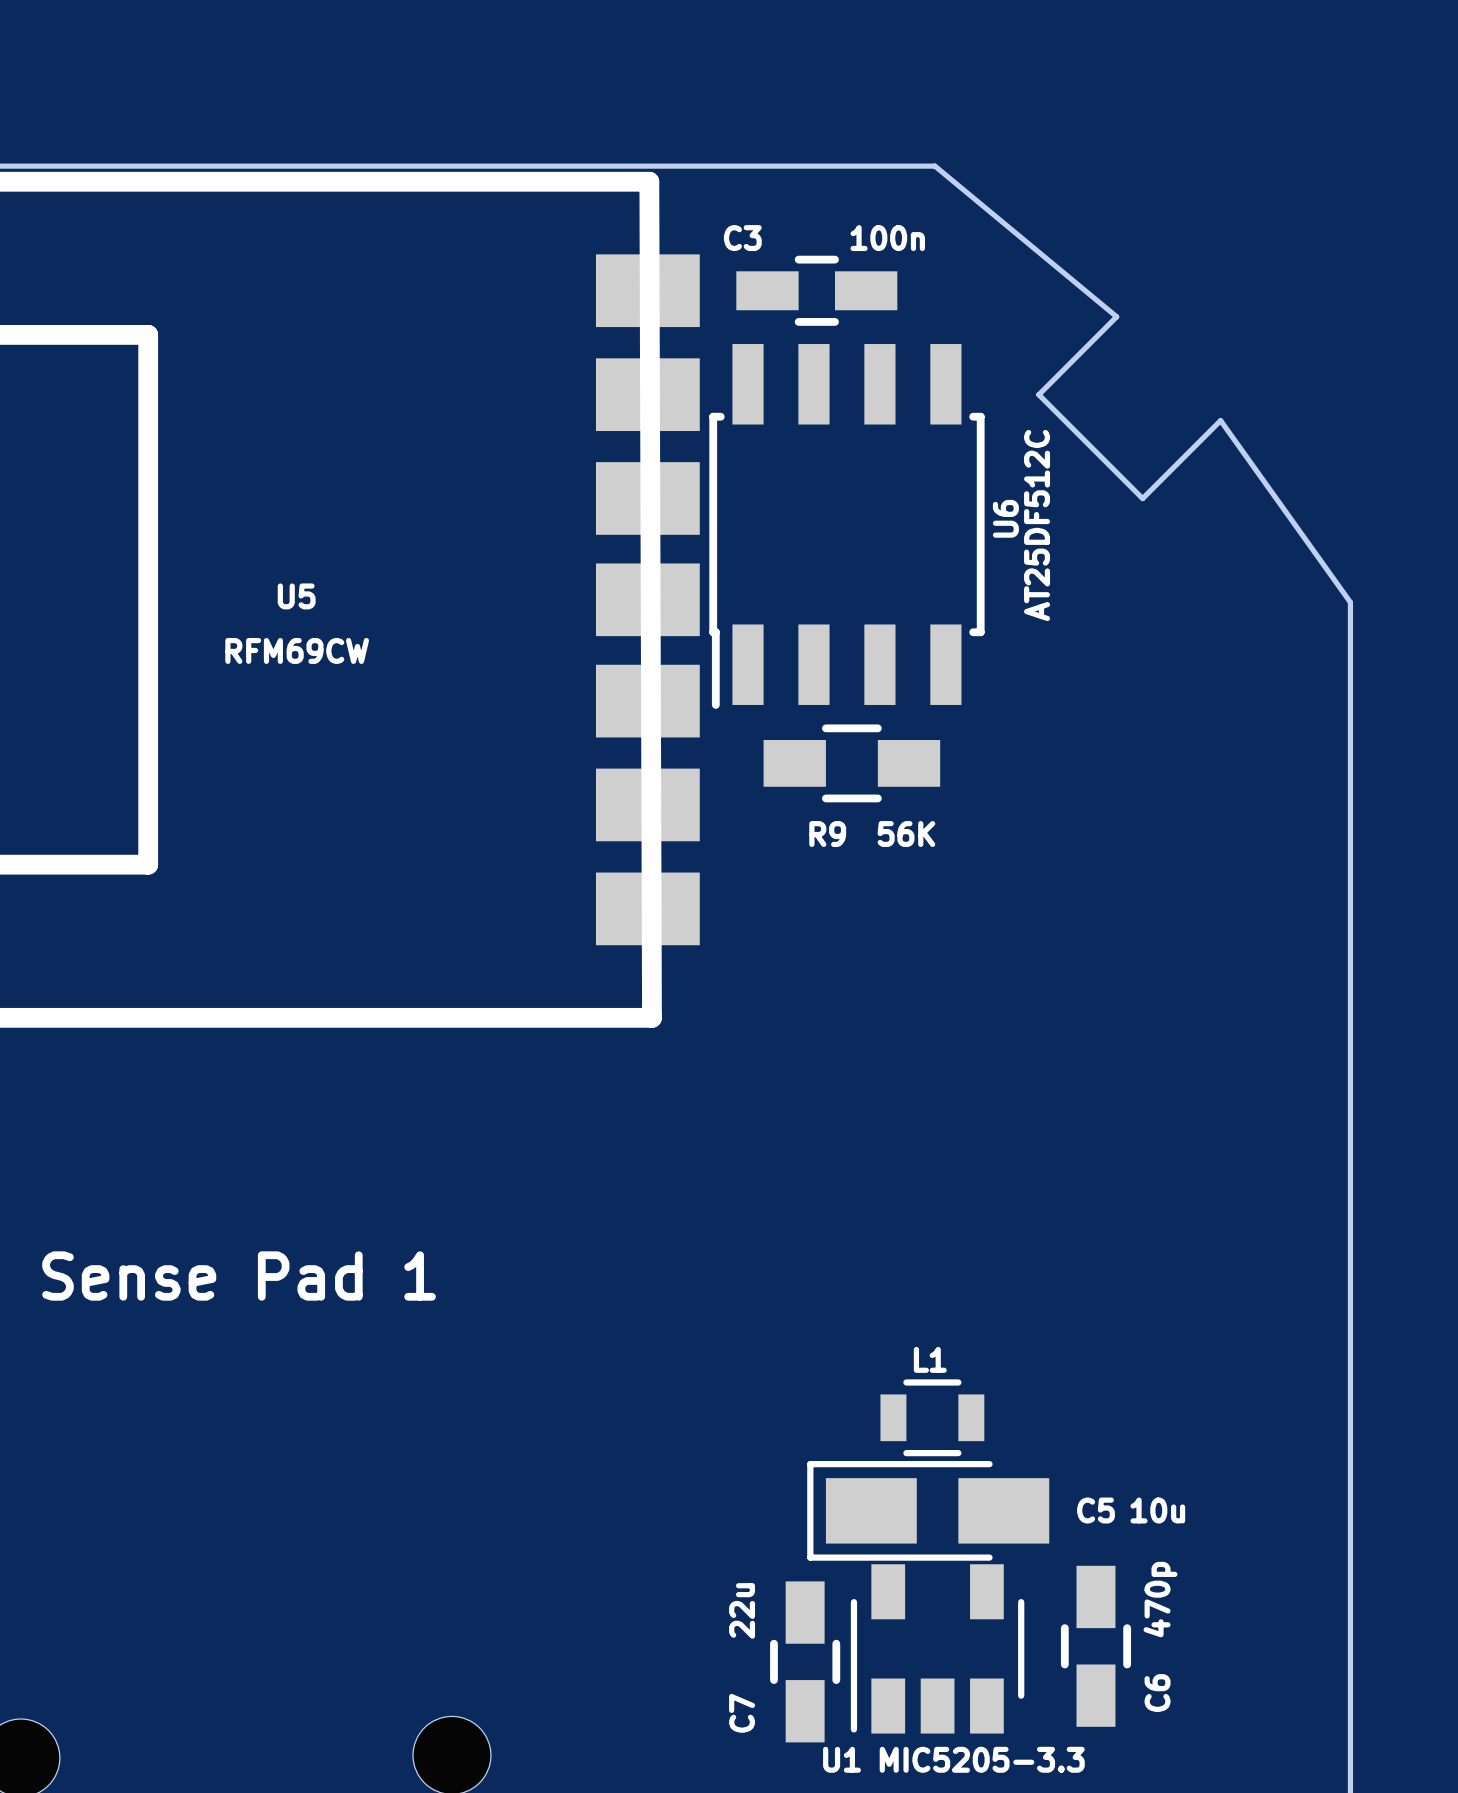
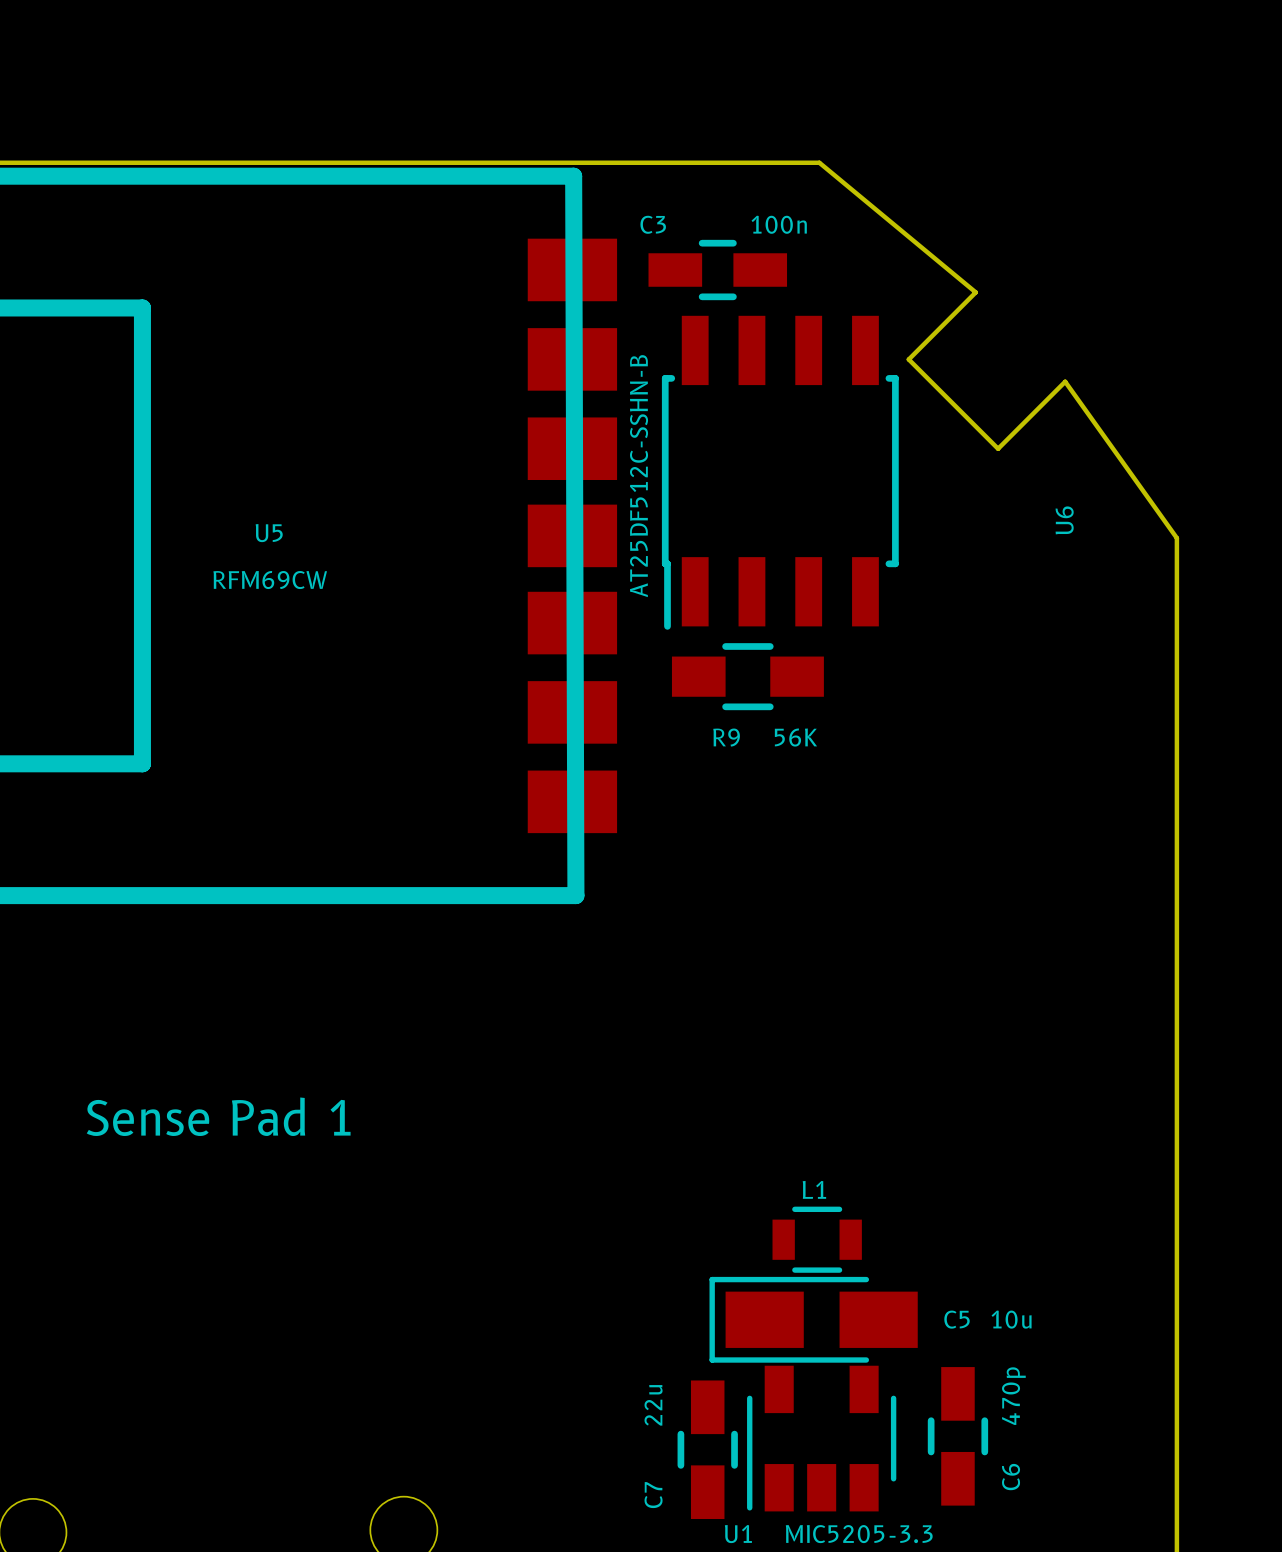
U6 name position: U6 (1005, 518) -> U6 (1064, 520)
U6 value: AT25DF512C (1037, 525) -> AT25DF512C-SSHN-B (639, 476)
U6 position: (846, 526) -> (780, 472)

